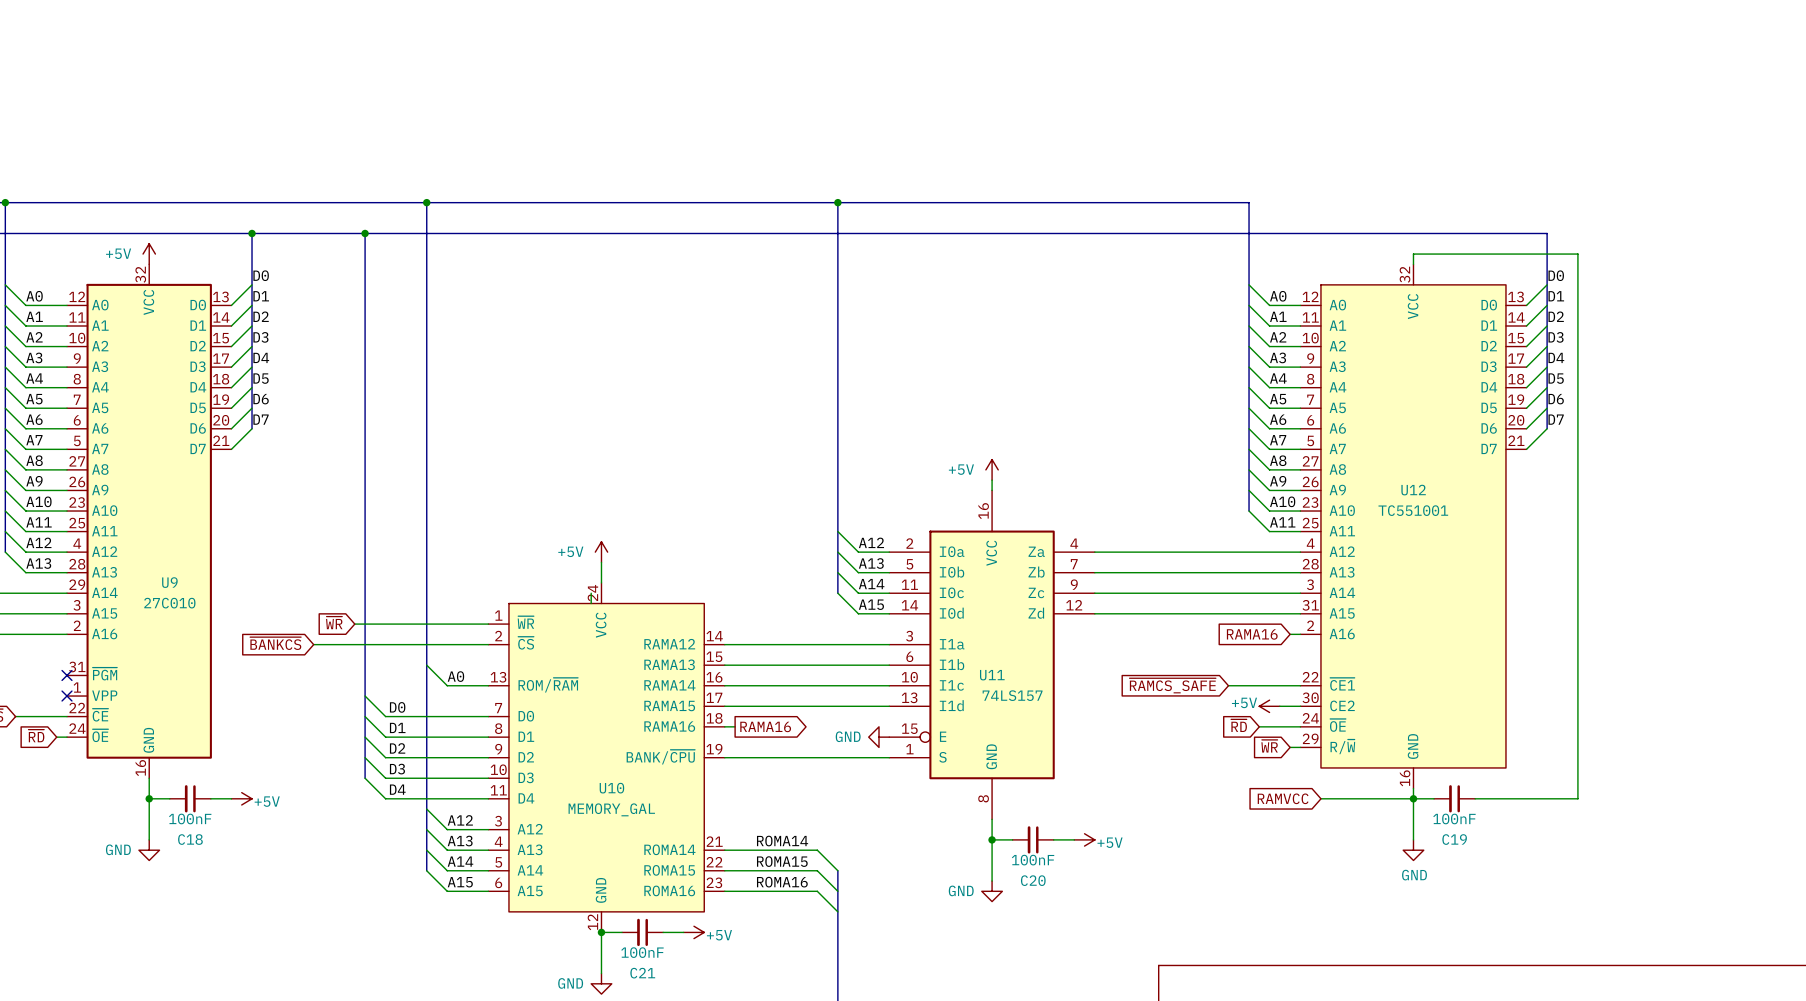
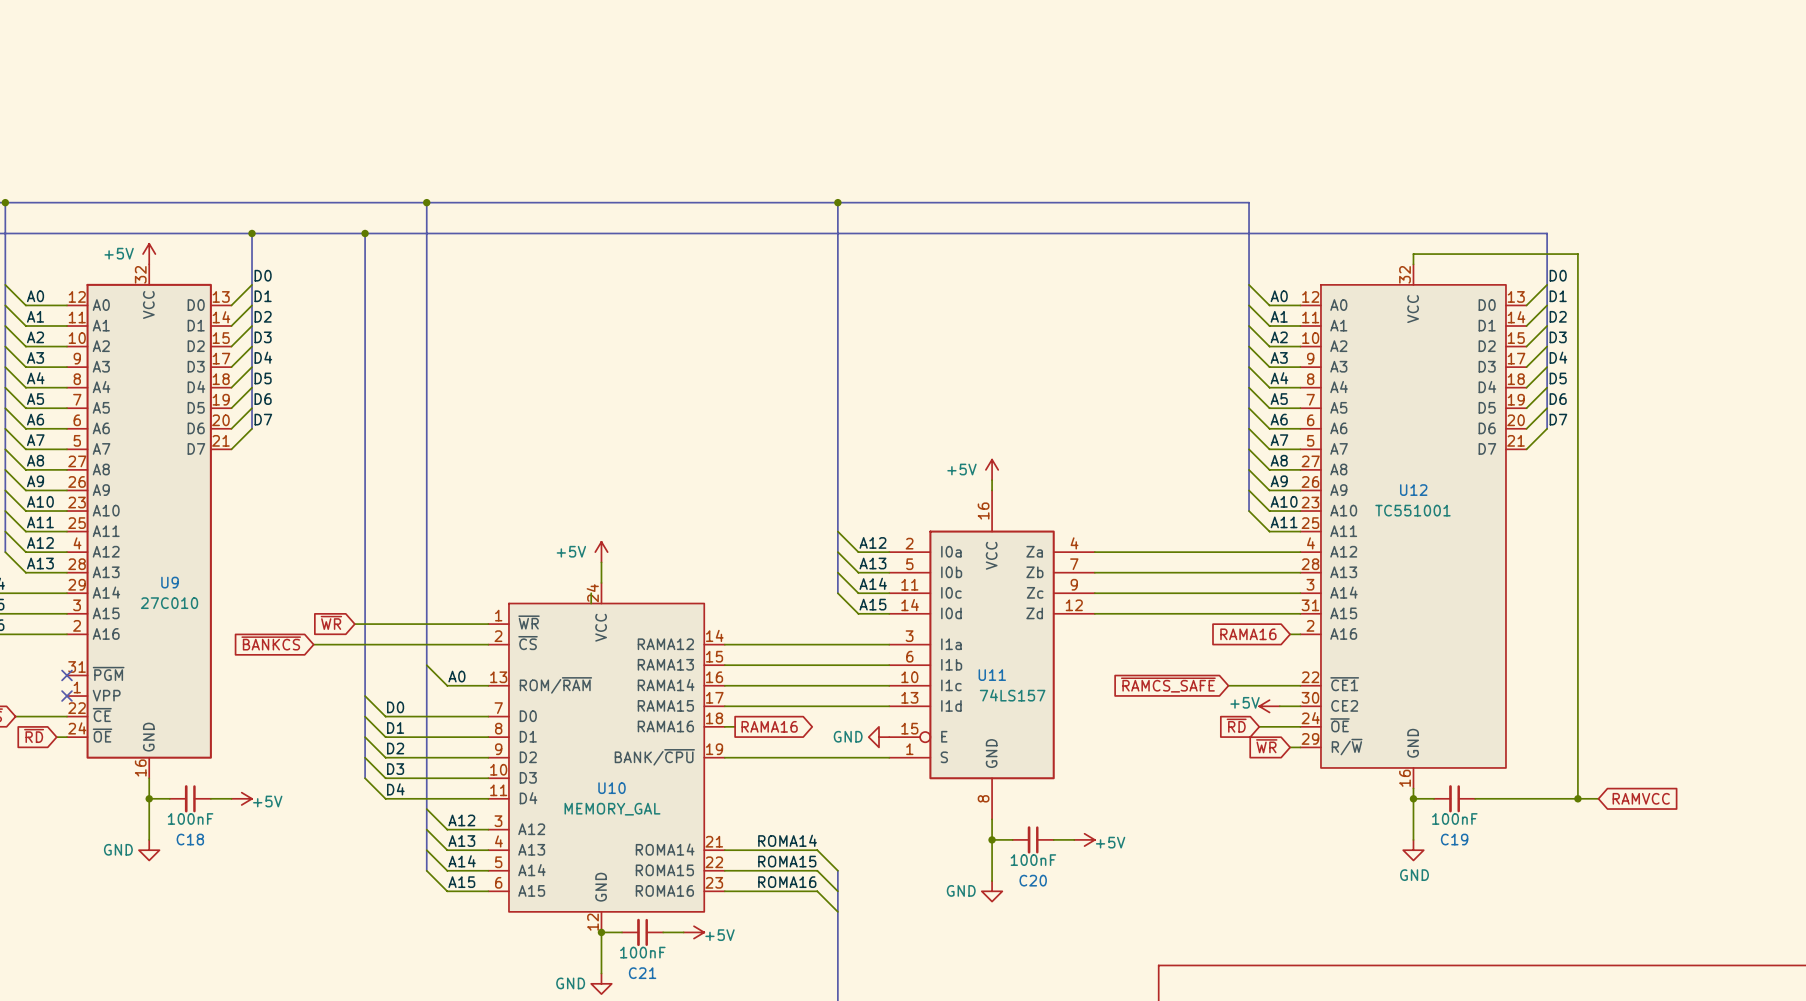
global label: RAMVCC (1283, 798) -> none
wire: (1320, 798) (1413, 798) -> none
wire: none -> (1577, 798) (1598, 798)
junction: none -> (1577, 798)
global label: none -> RAMVCC (1641, 798)

